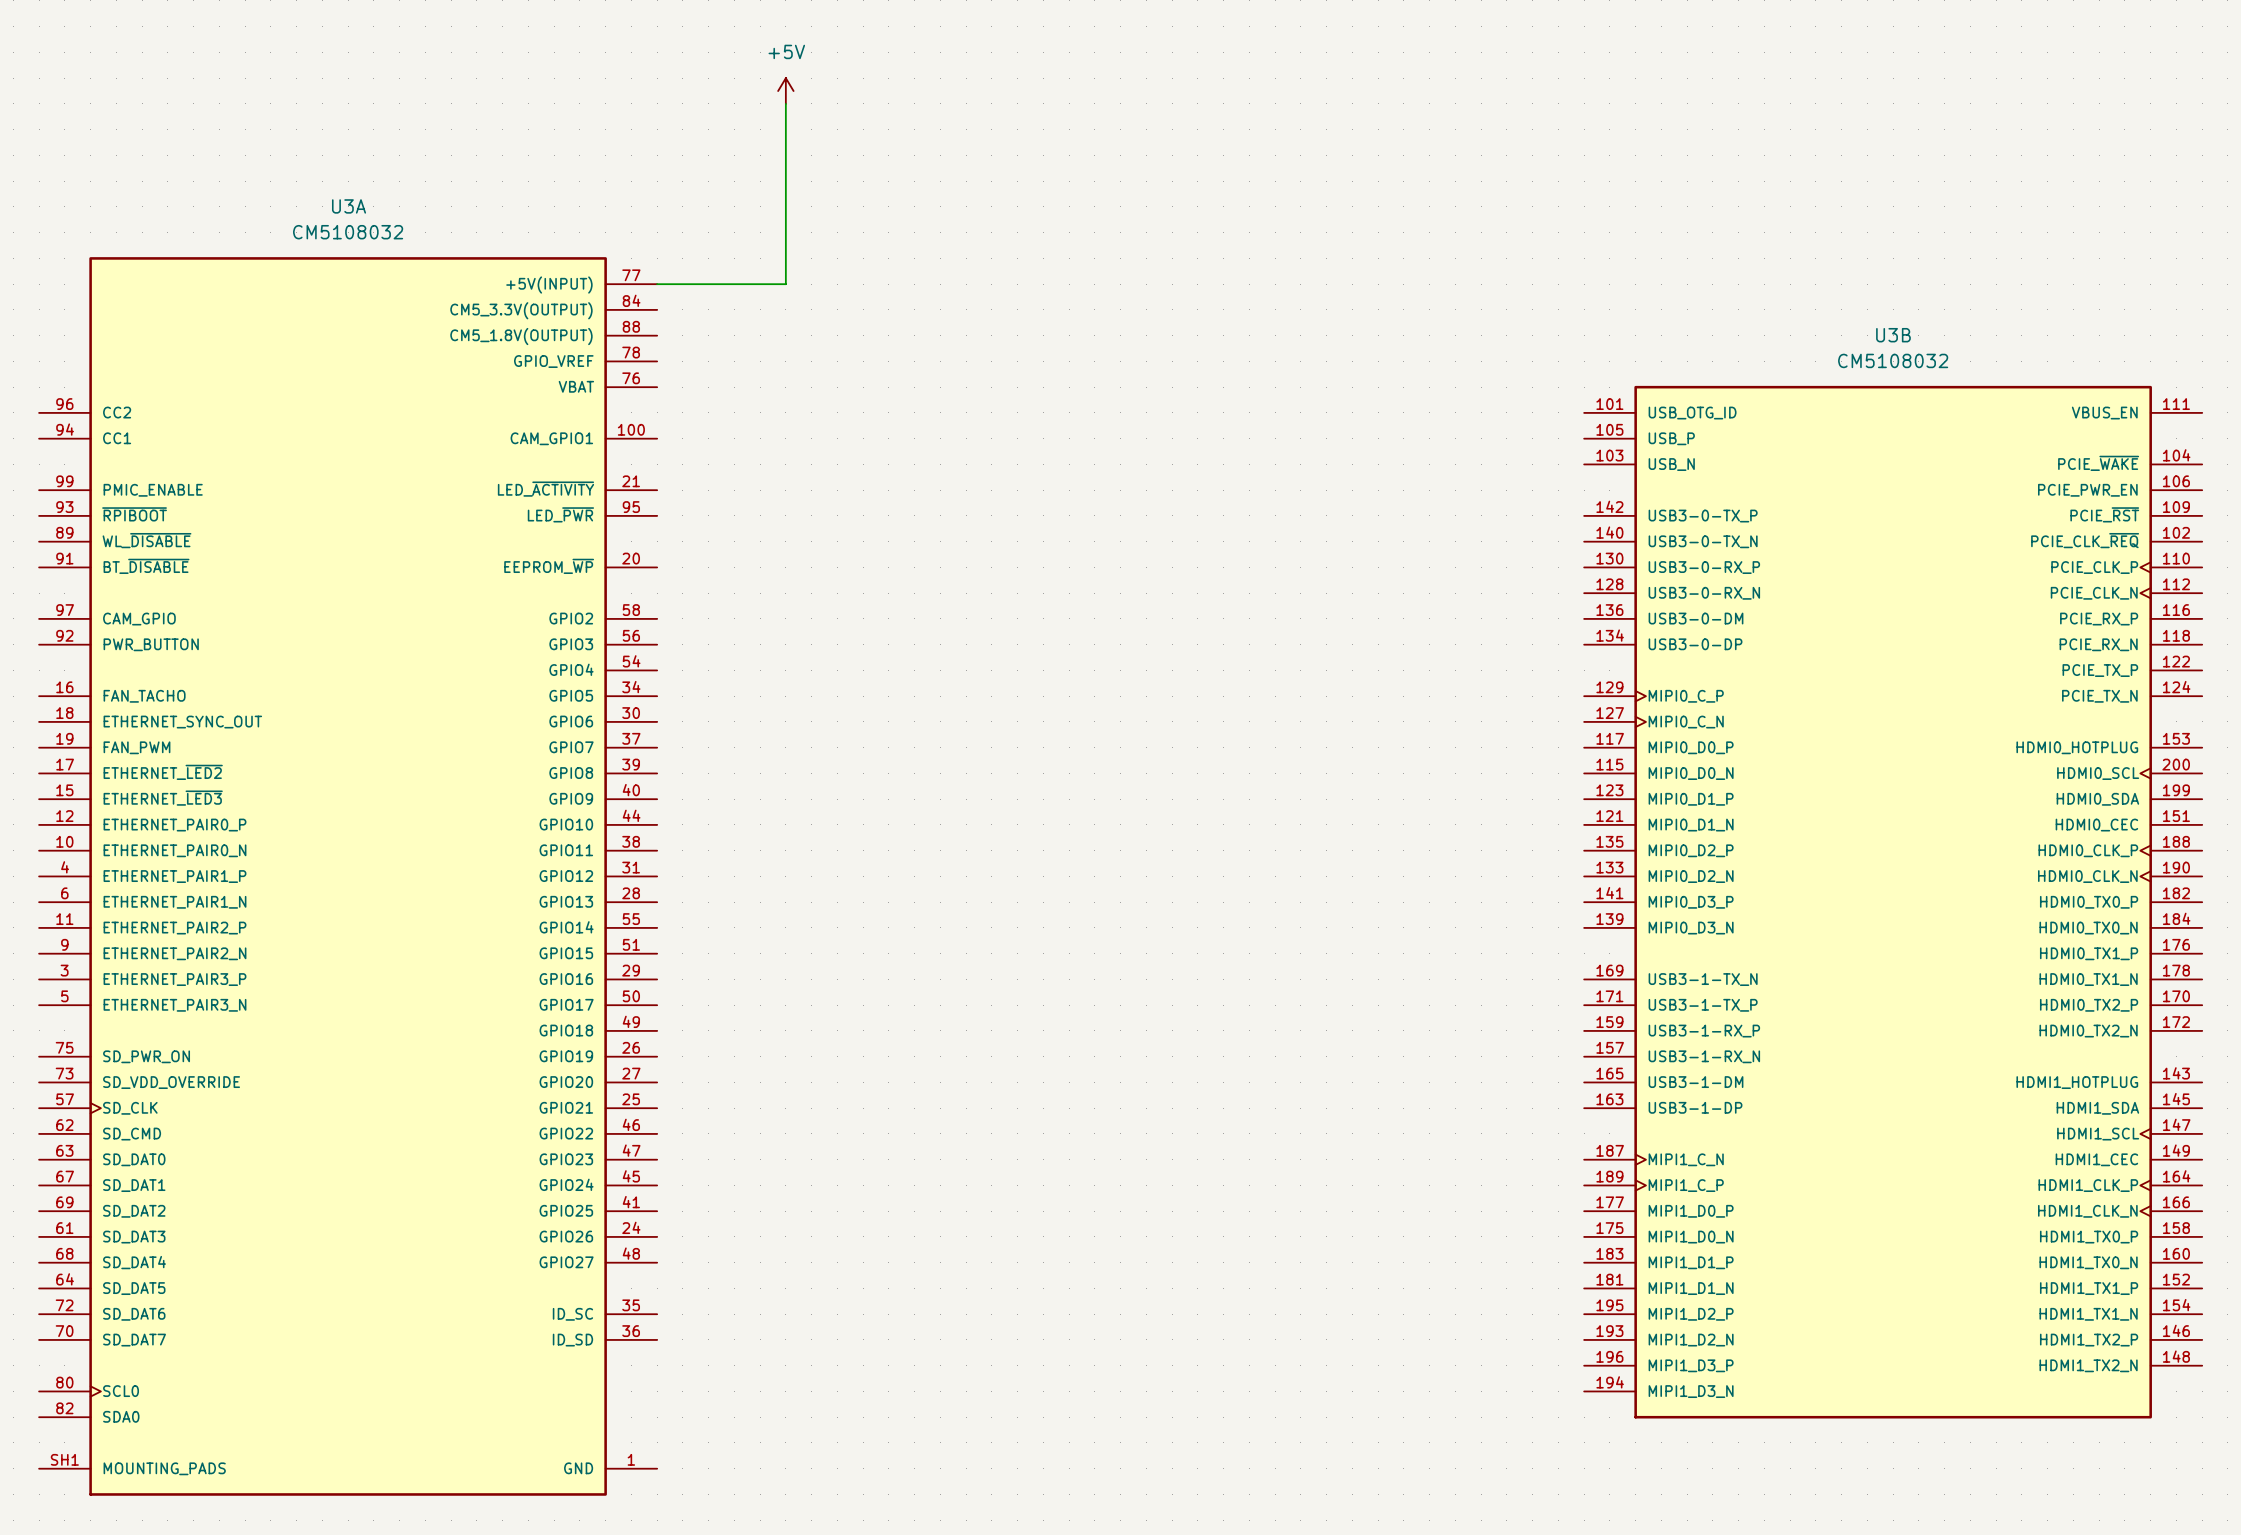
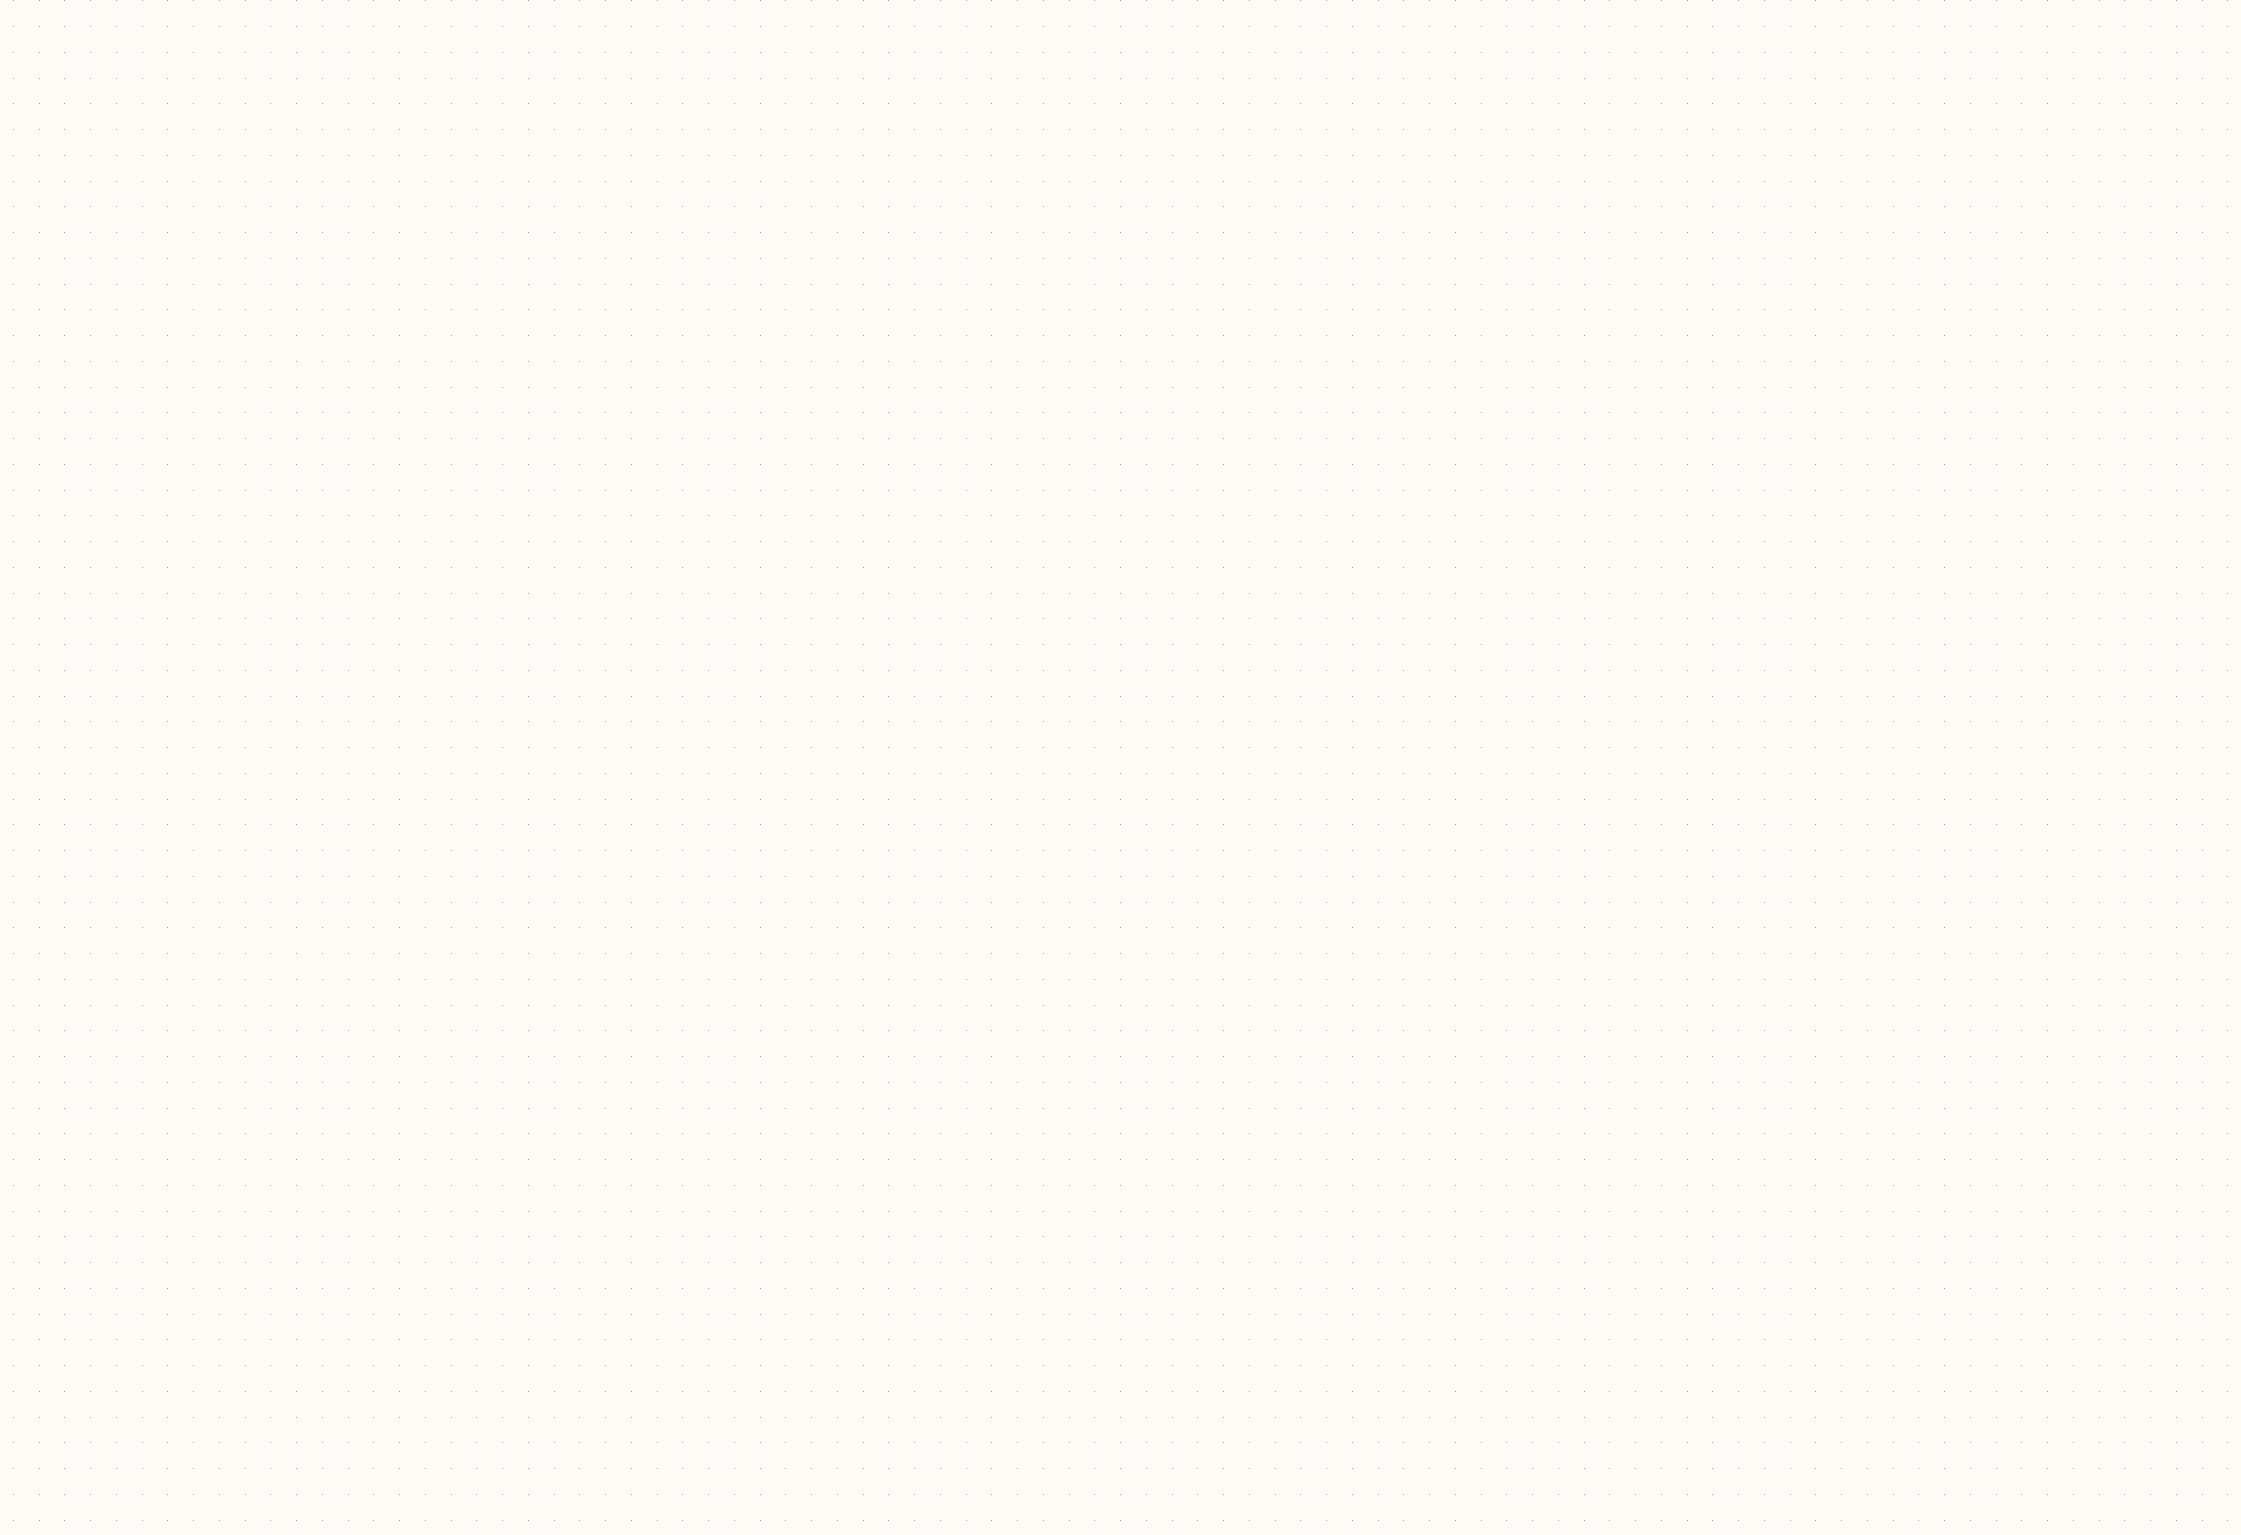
power symbol: +5V (785, 91) -> none
wire: (785, 103) (785, 284) (657, 284) -> none
U3A: CM5108032 (348, 876) -> none
U3B: CM5108032 (1893, 902) -> none

